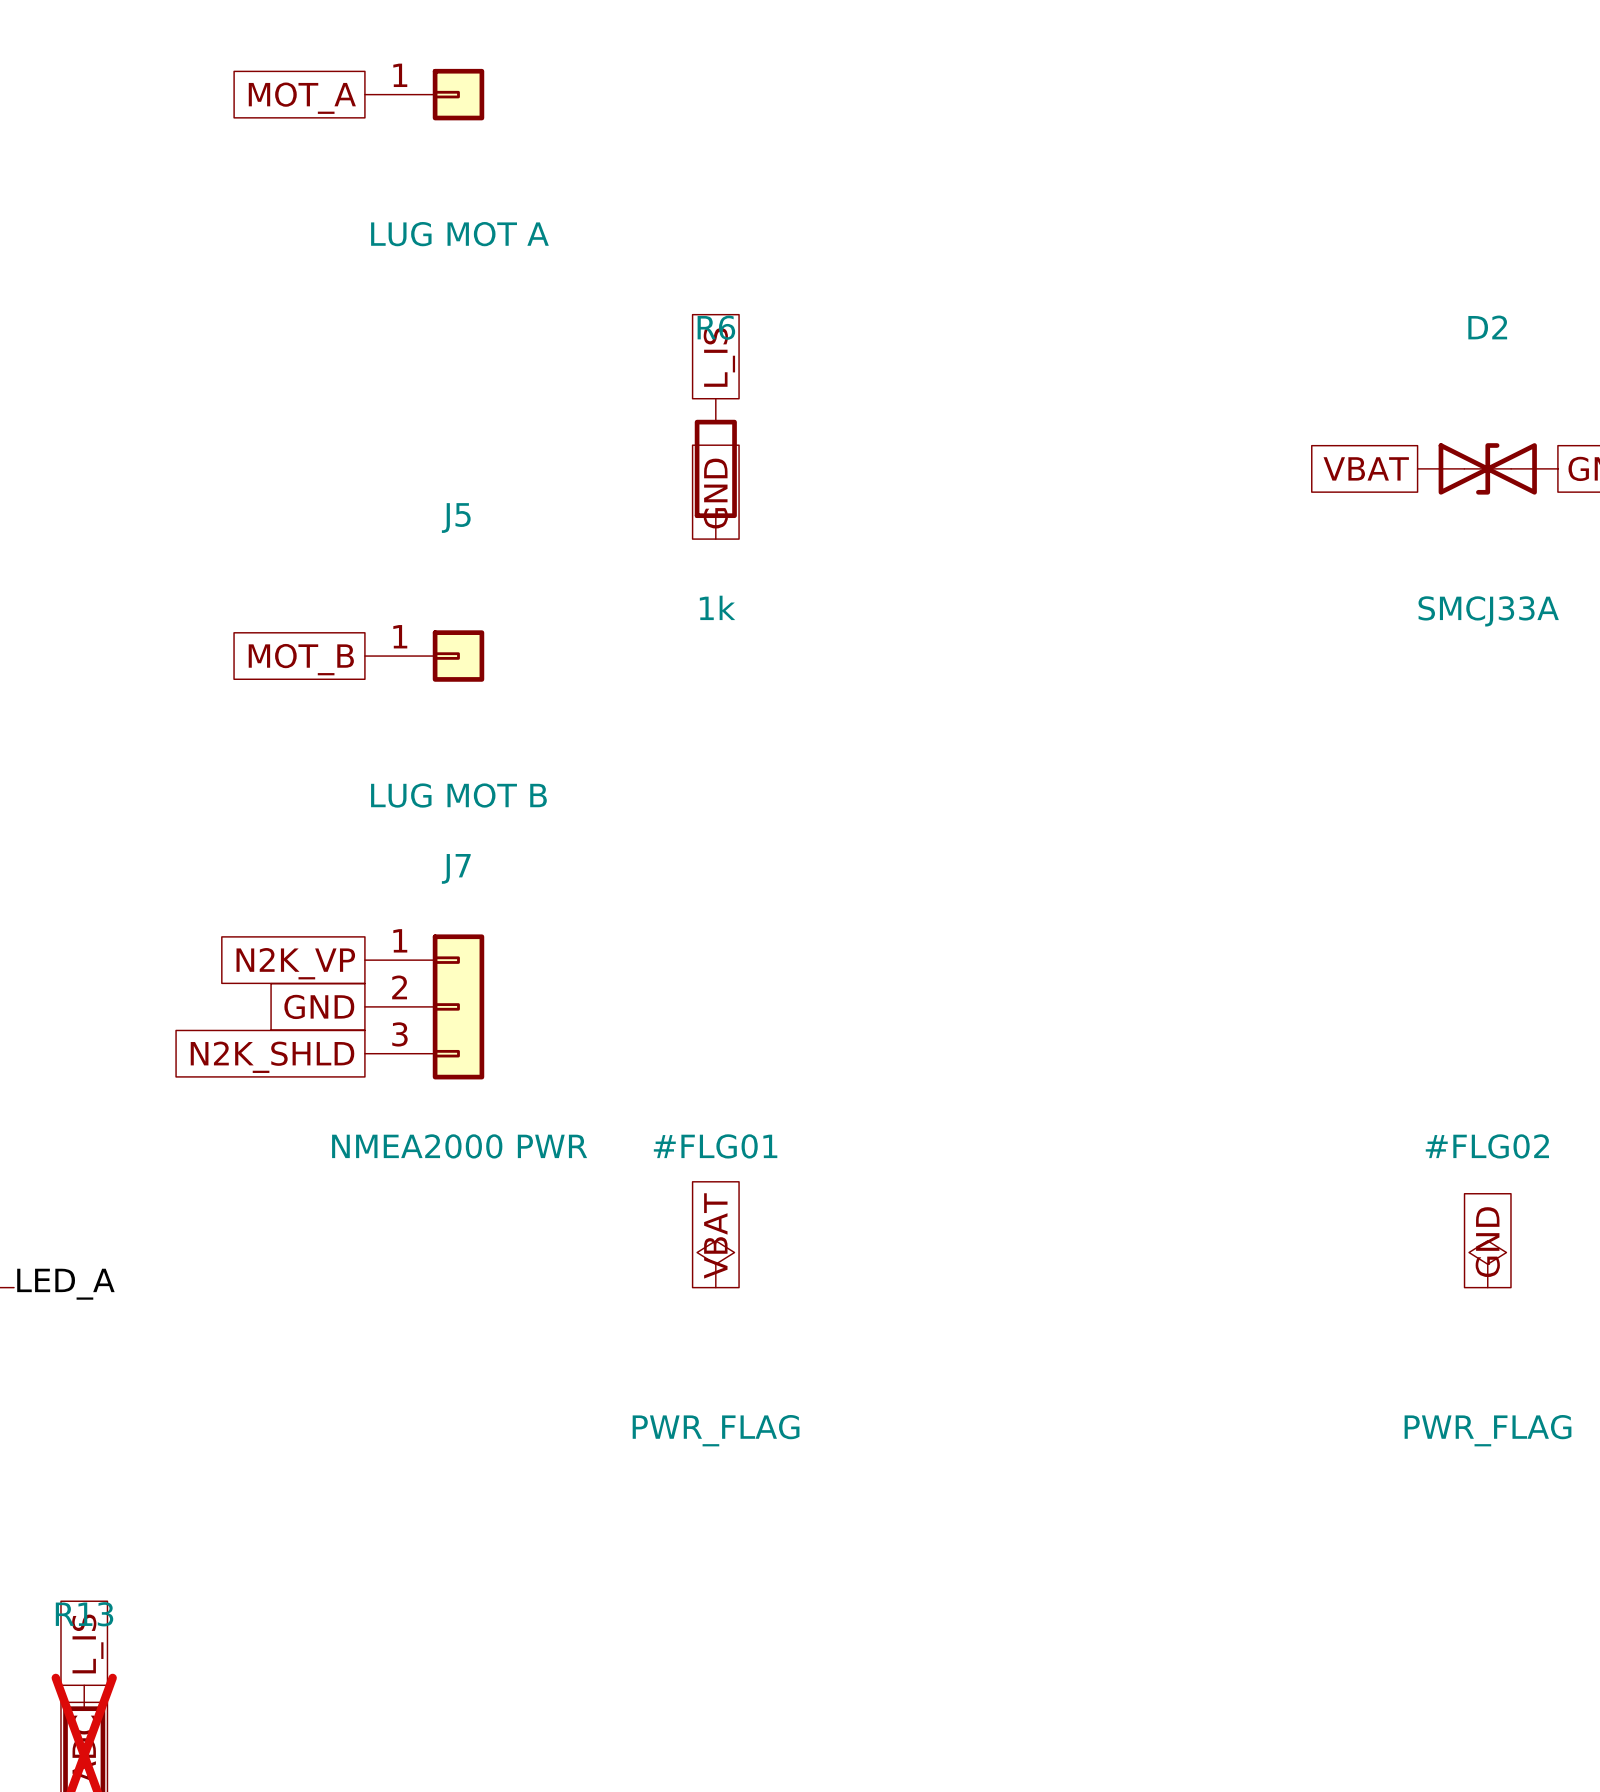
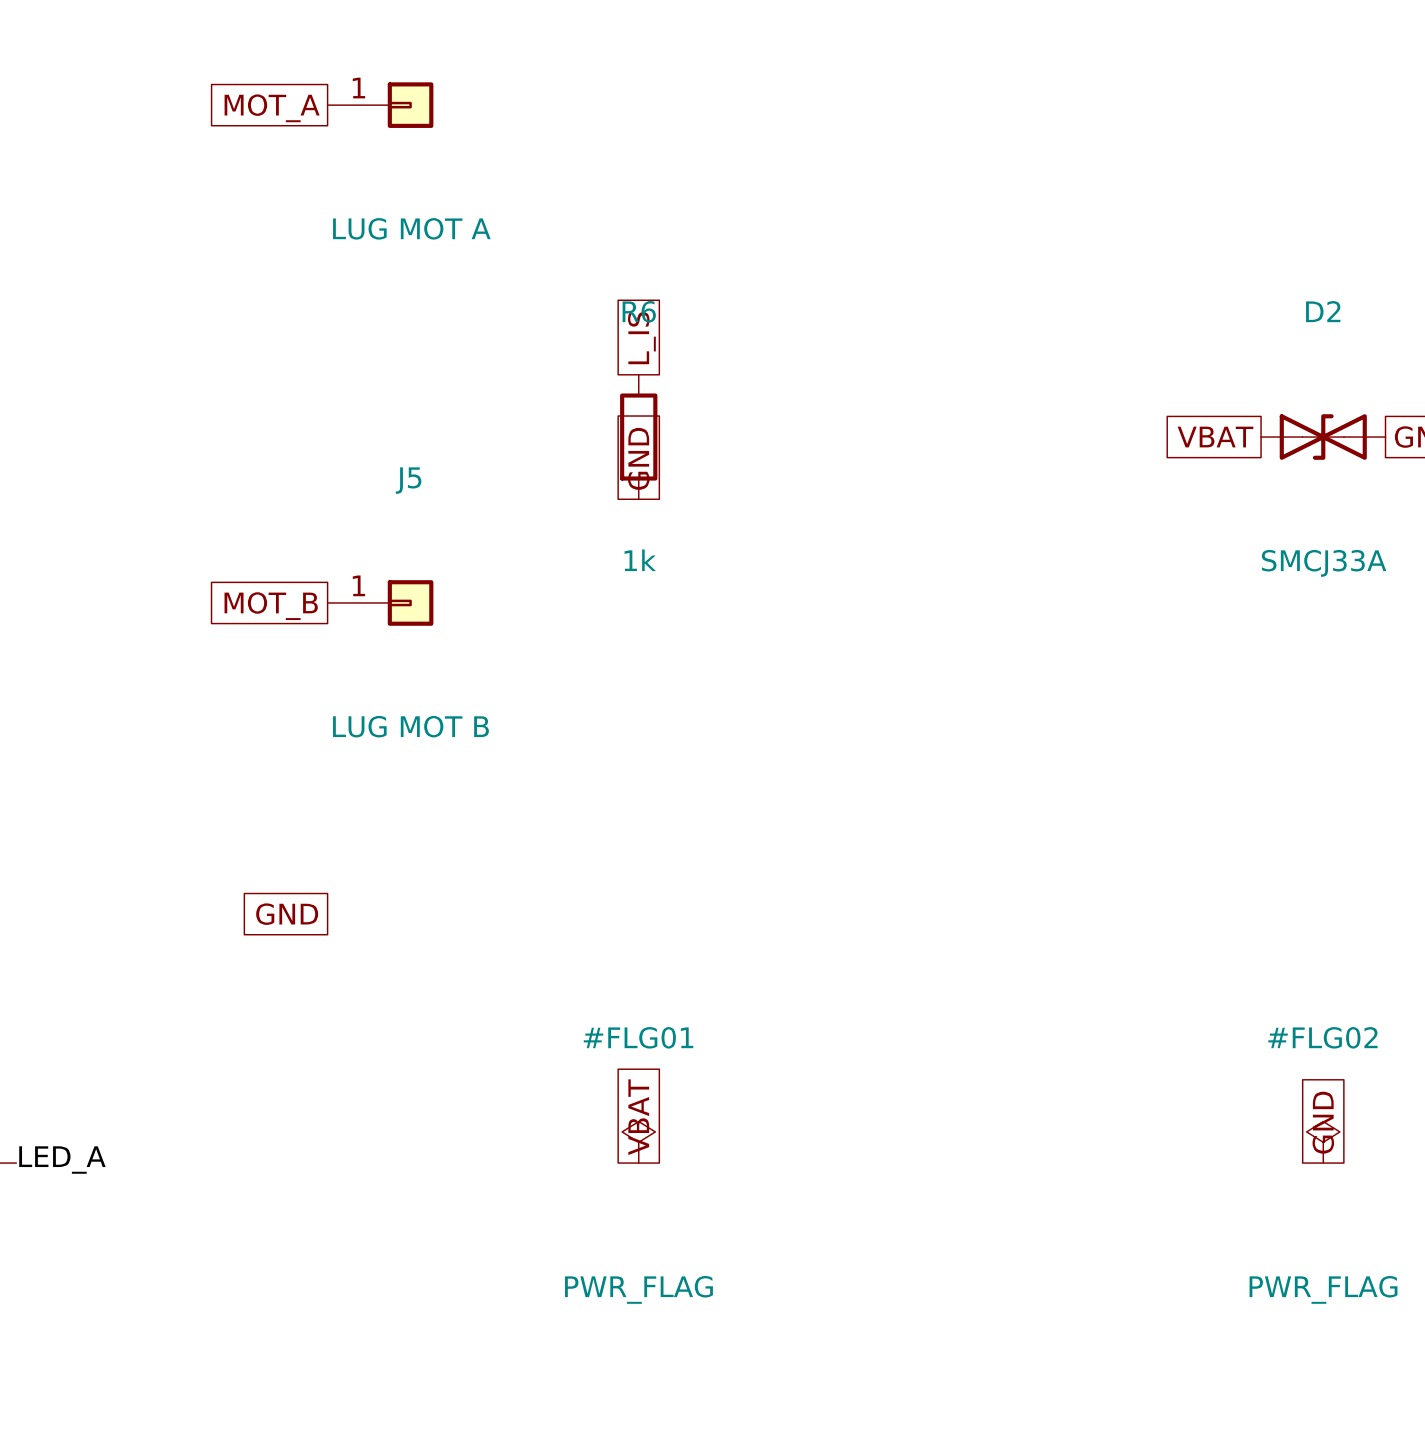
global label: N2K_VP (295, 963) -> none
J7: NMEA2000 PWR (424, 1006) -> none
global label: N2K_SHLD (272, 1057) -> none

